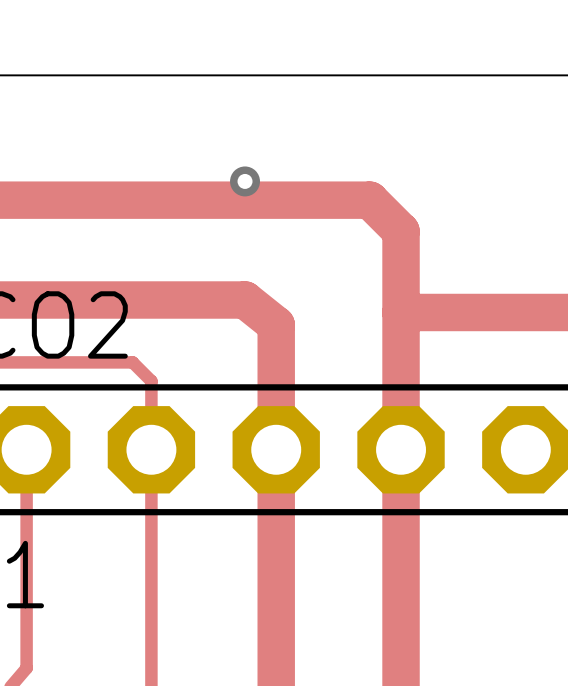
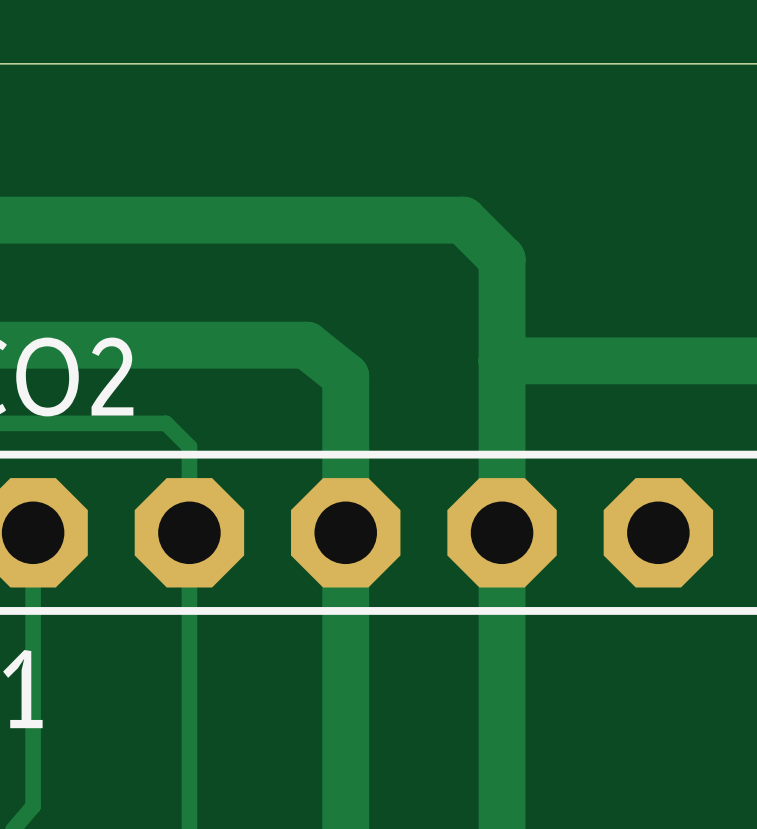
via: (245, 181) -> none

